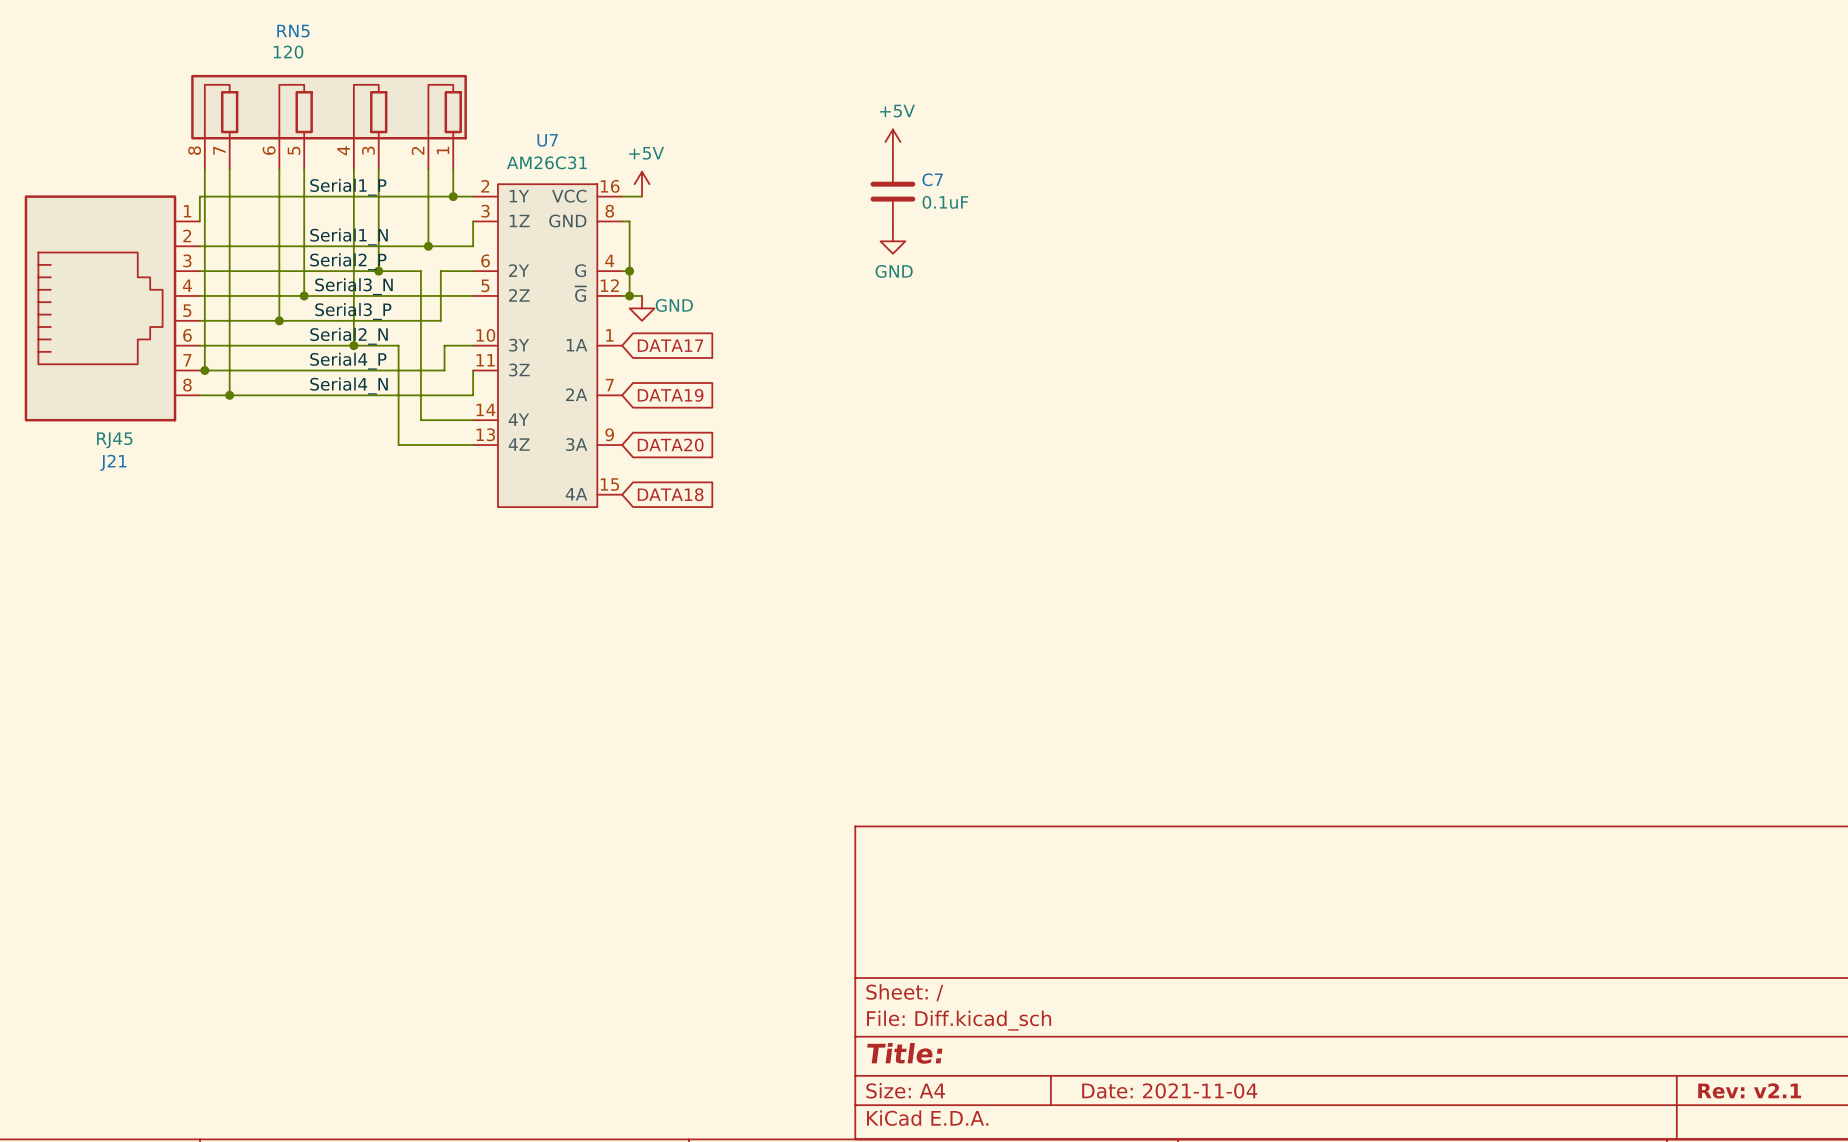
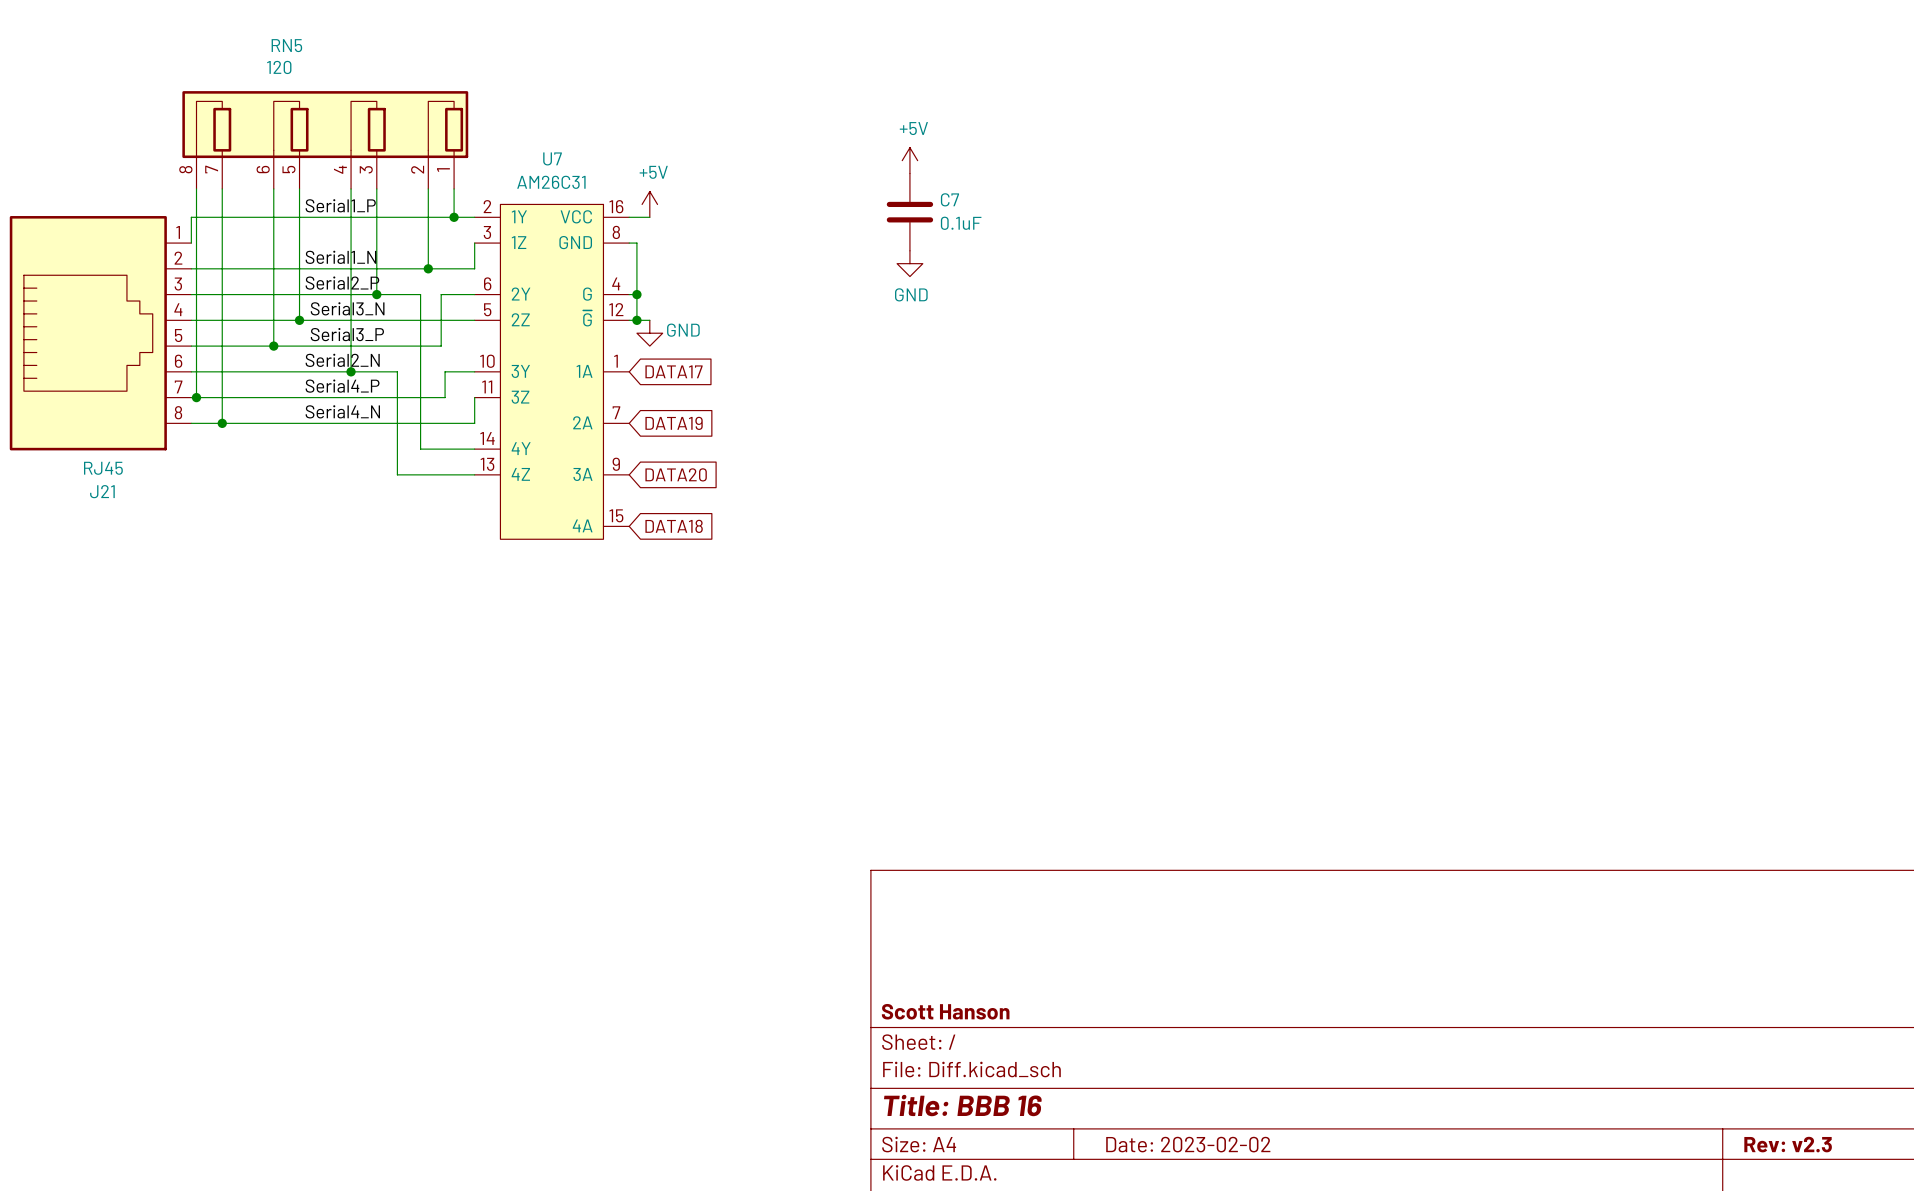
title block: none -> Scott Hanson (945, 1011)
title block: Title: (904, 1053) -> Title: BBB 16 (962, 1105)
title block: Date: 2021-11-04 (1169, 1090) -> Date: 2023-02-02 (1188, 1144)
title block: Rev: v2.1 (1749, 1090) -> Rev: v2.3 (1788, 1144)

